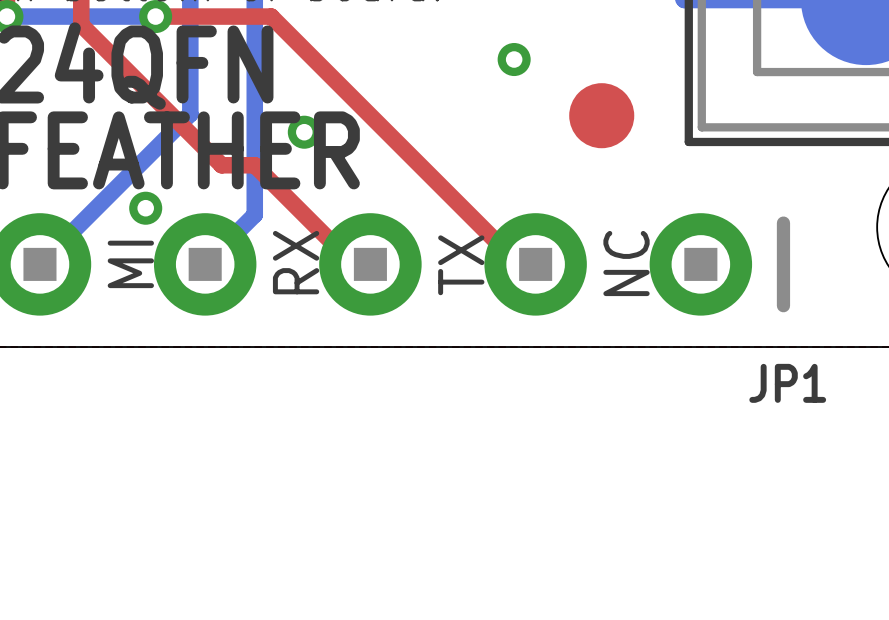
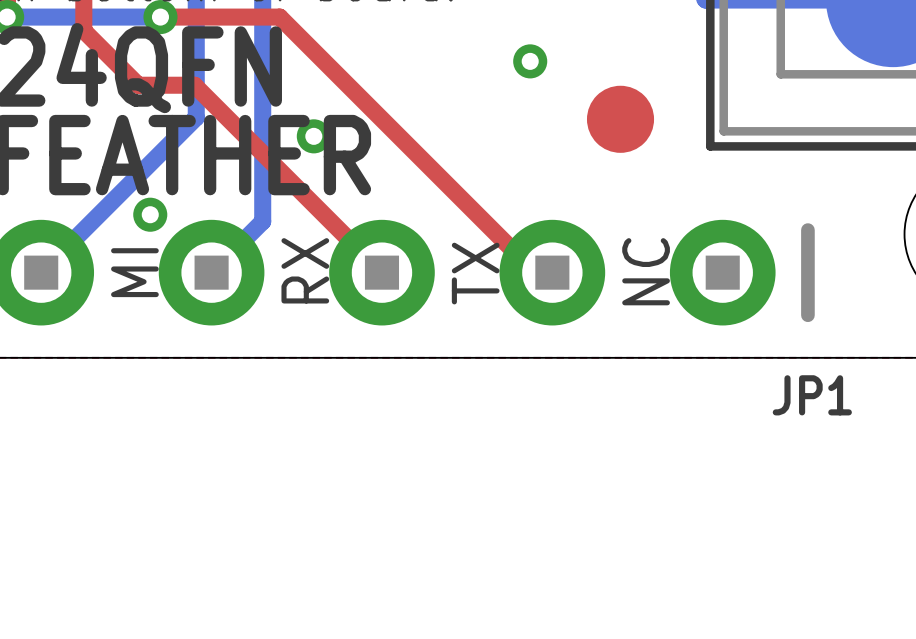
top track: (81, 24) (221, 165) (254, 165) (353, 264) (370, 264) -> (83, 25) (83, 30) (138, 85) (194, 85) (381, 272)

